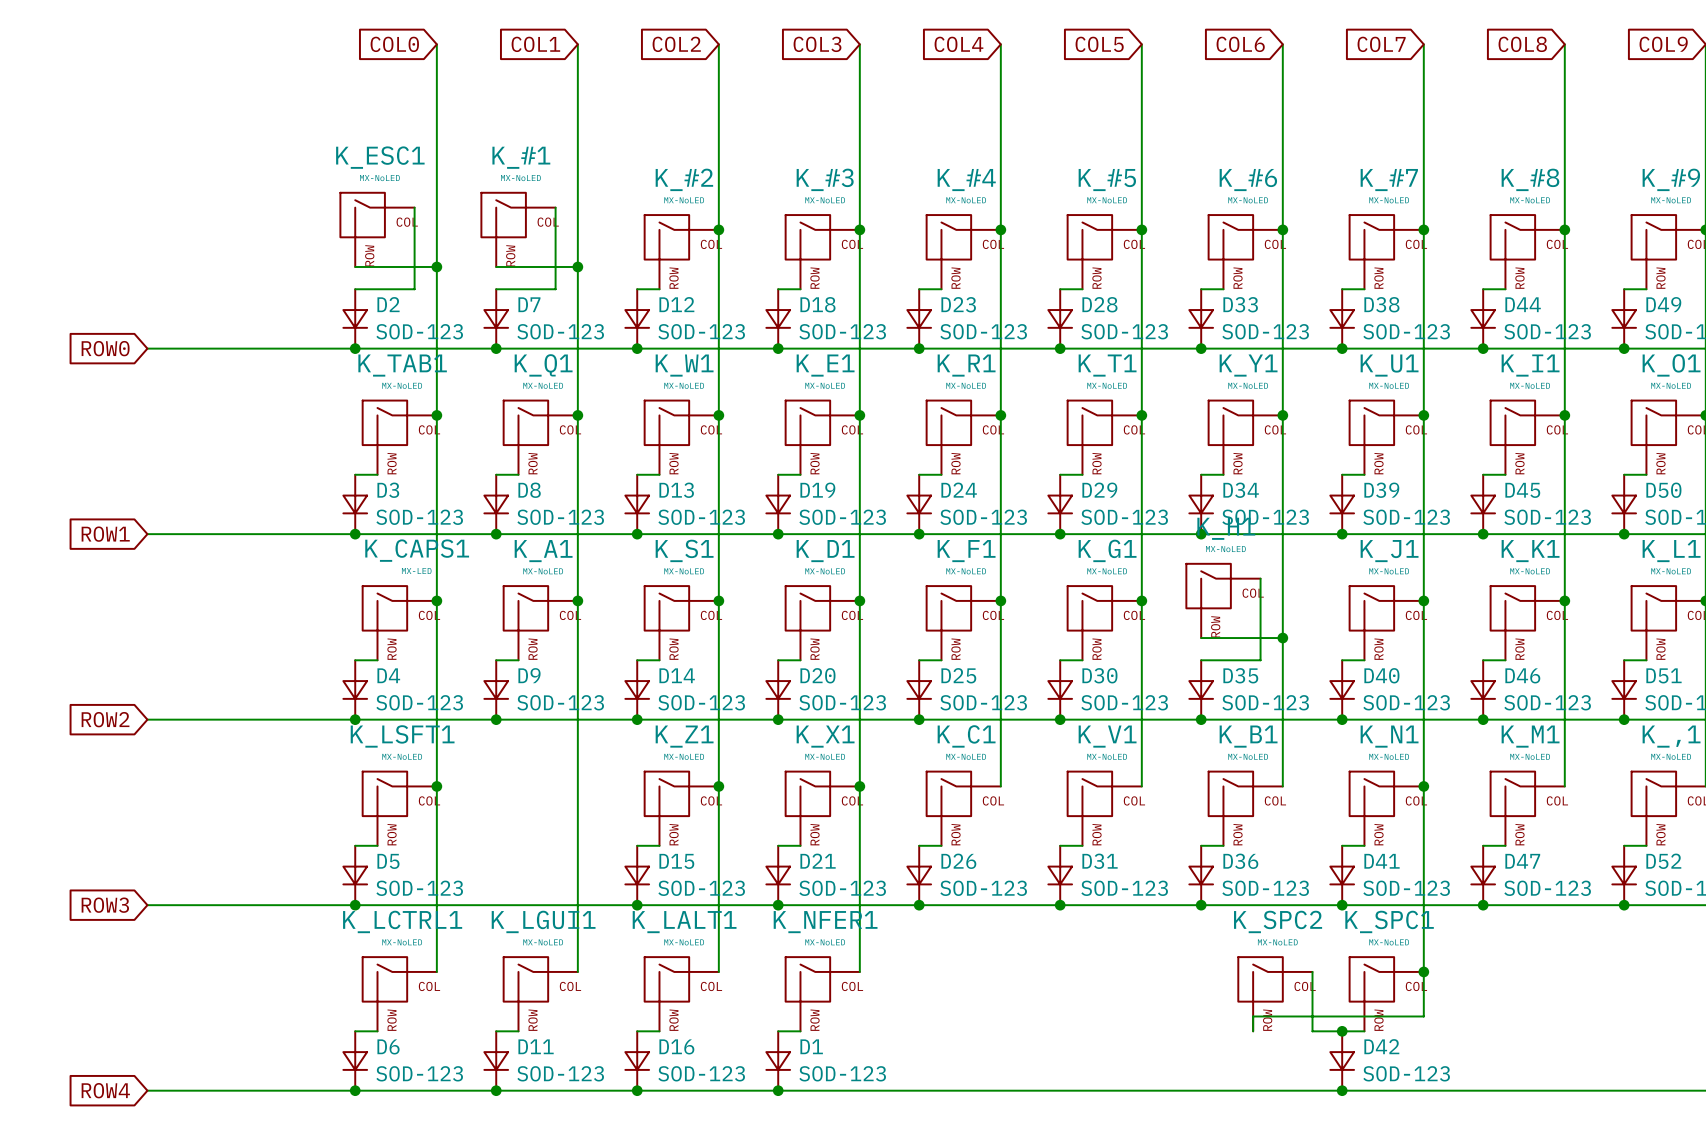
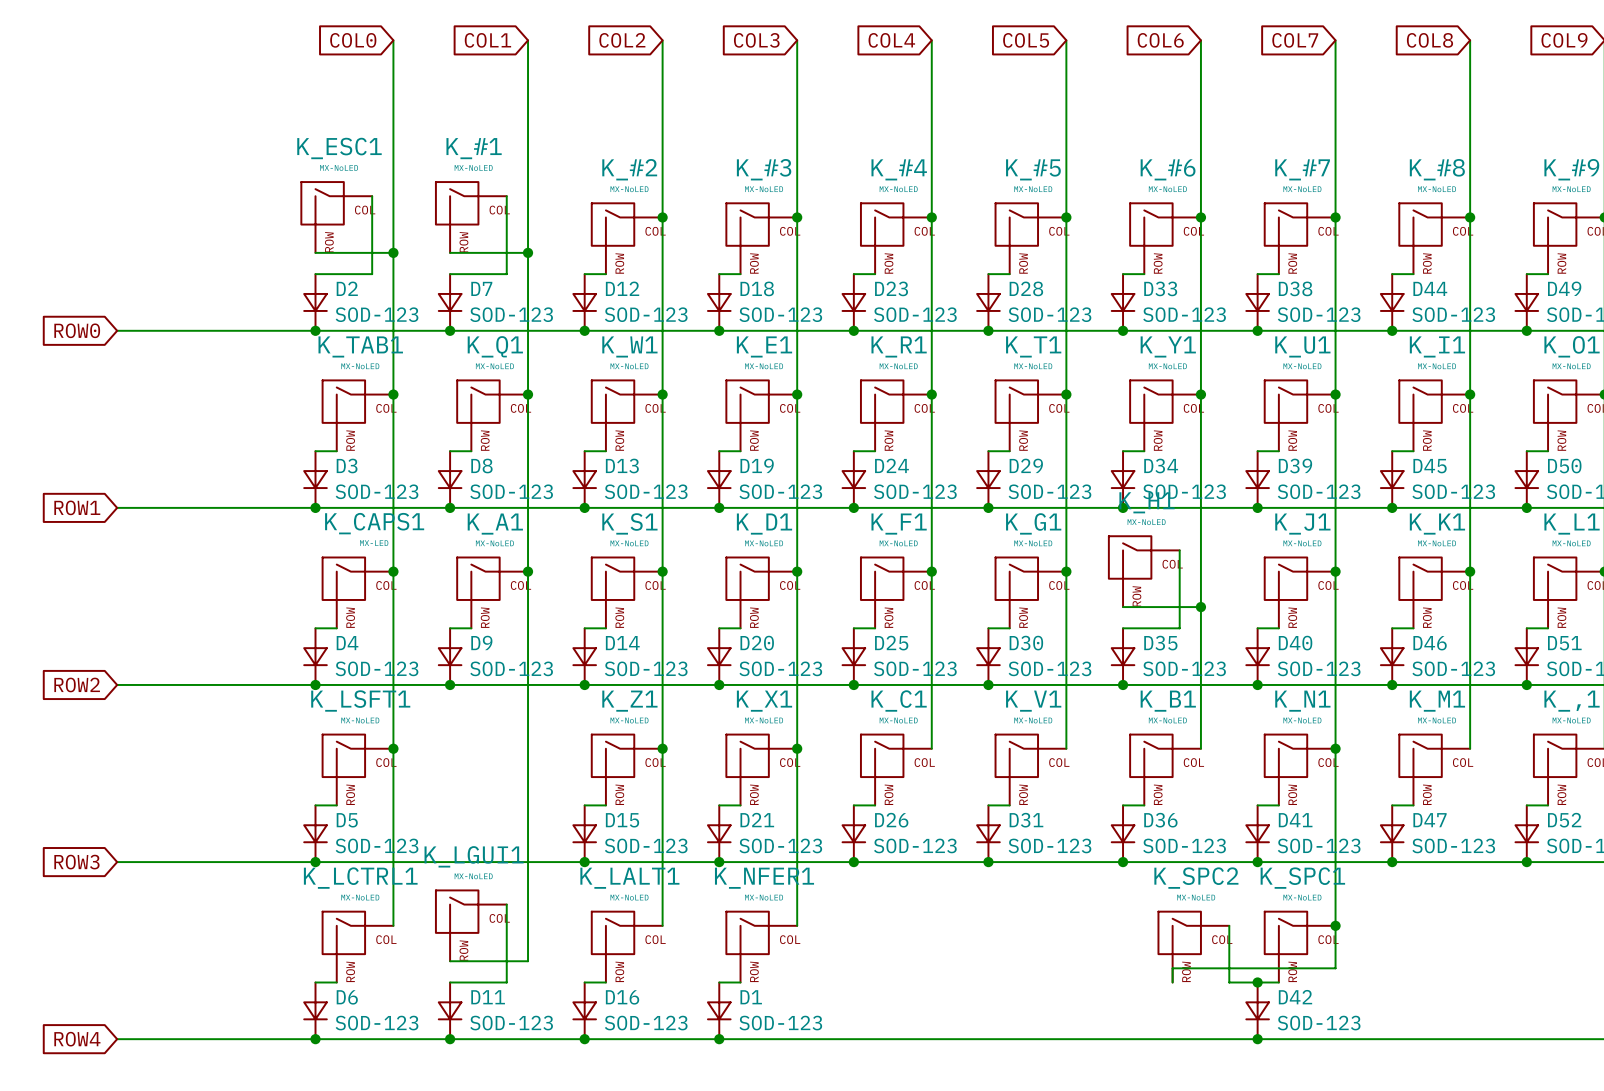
wire: none -> (506, 904) (506, 982) (471, 982)
wire: none -> (528, 925) (528, 961) (450, 961)
K_LGUI1 position: (540, 994) -> (471, 925)

